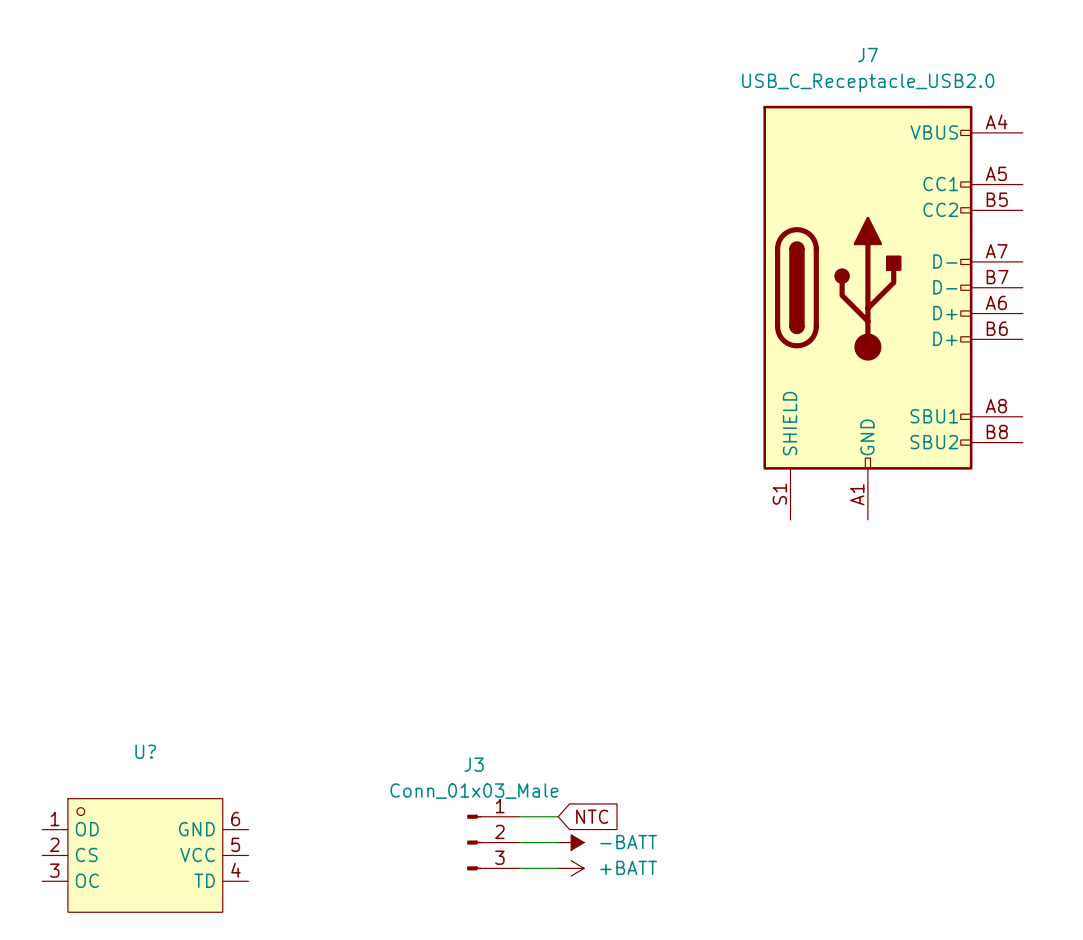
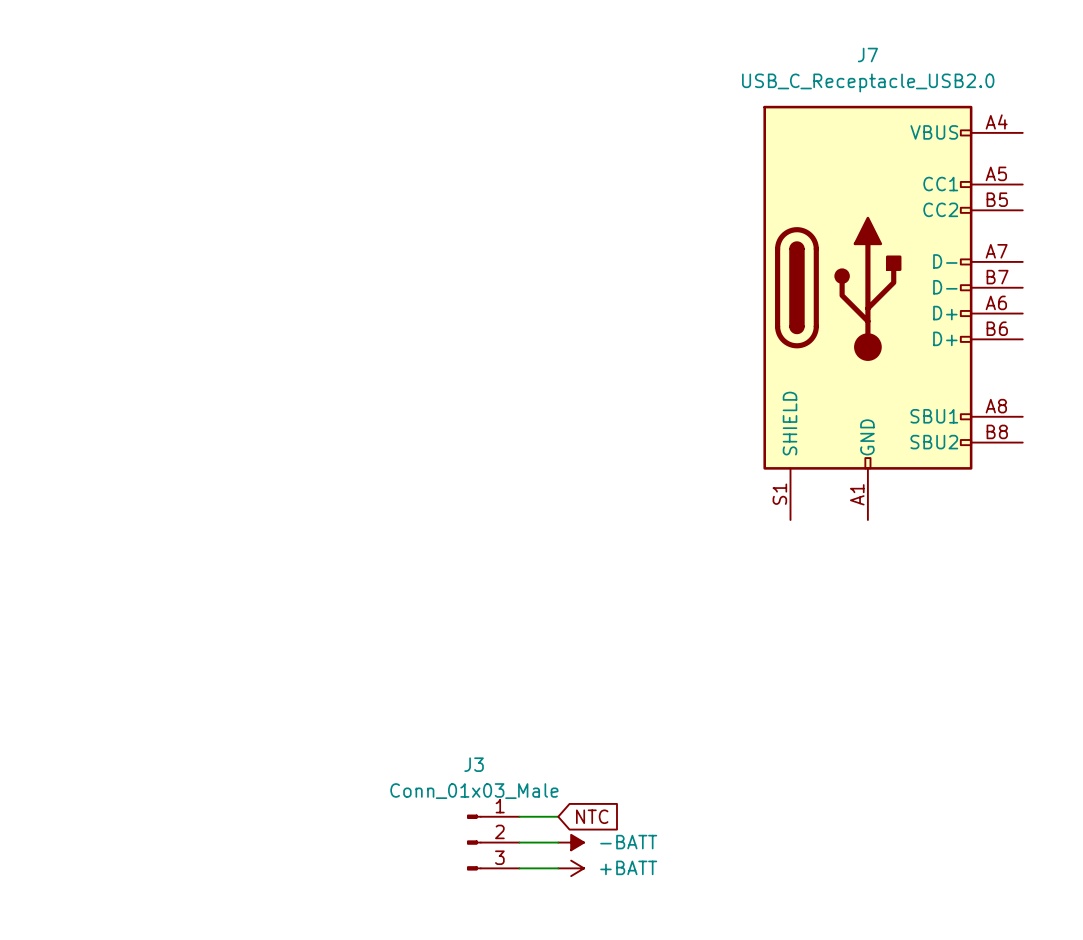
U?: (145, 855) -> none

